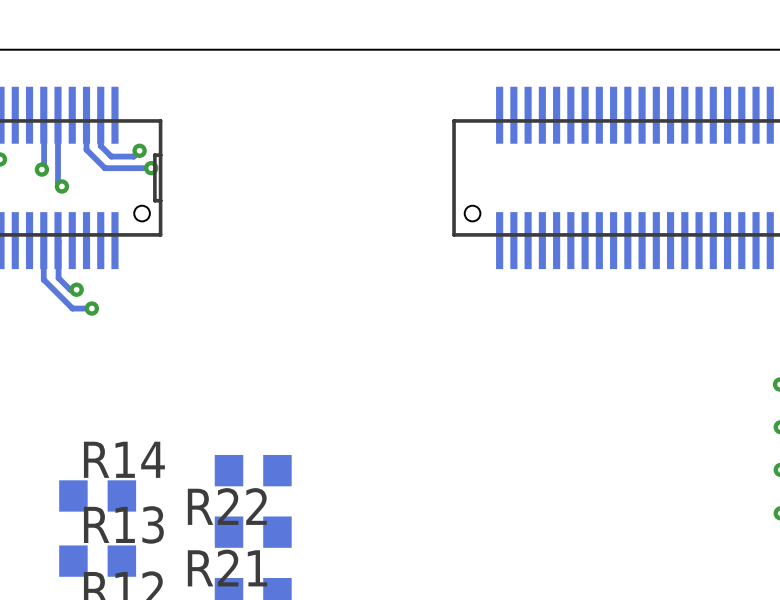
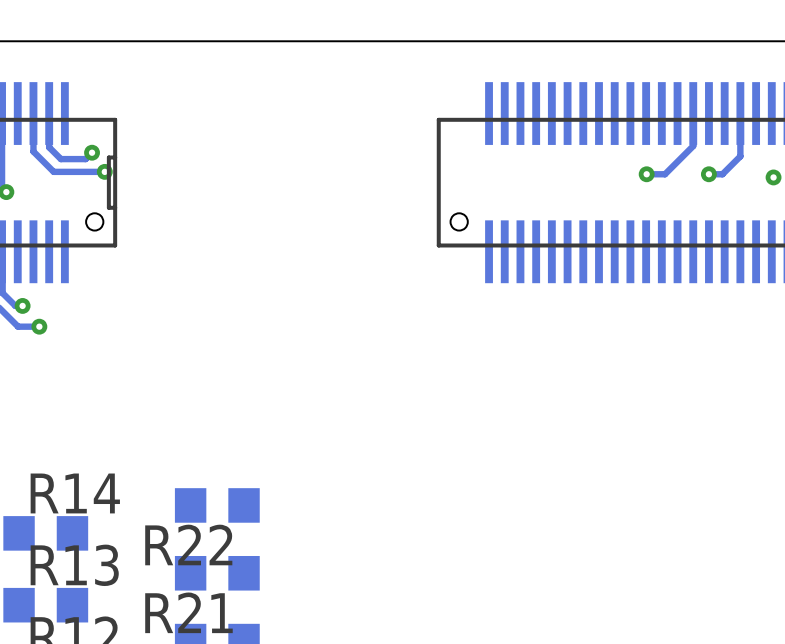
track: none -> (693, 113) (693, 146) (665, 174) (646, 174)
track: none -> (740, 113) (740, 156) (722, 174) (708, 174)
via: none -> (646, 174)
via: none -> (708, 174)
via: none -> (773, 177)

